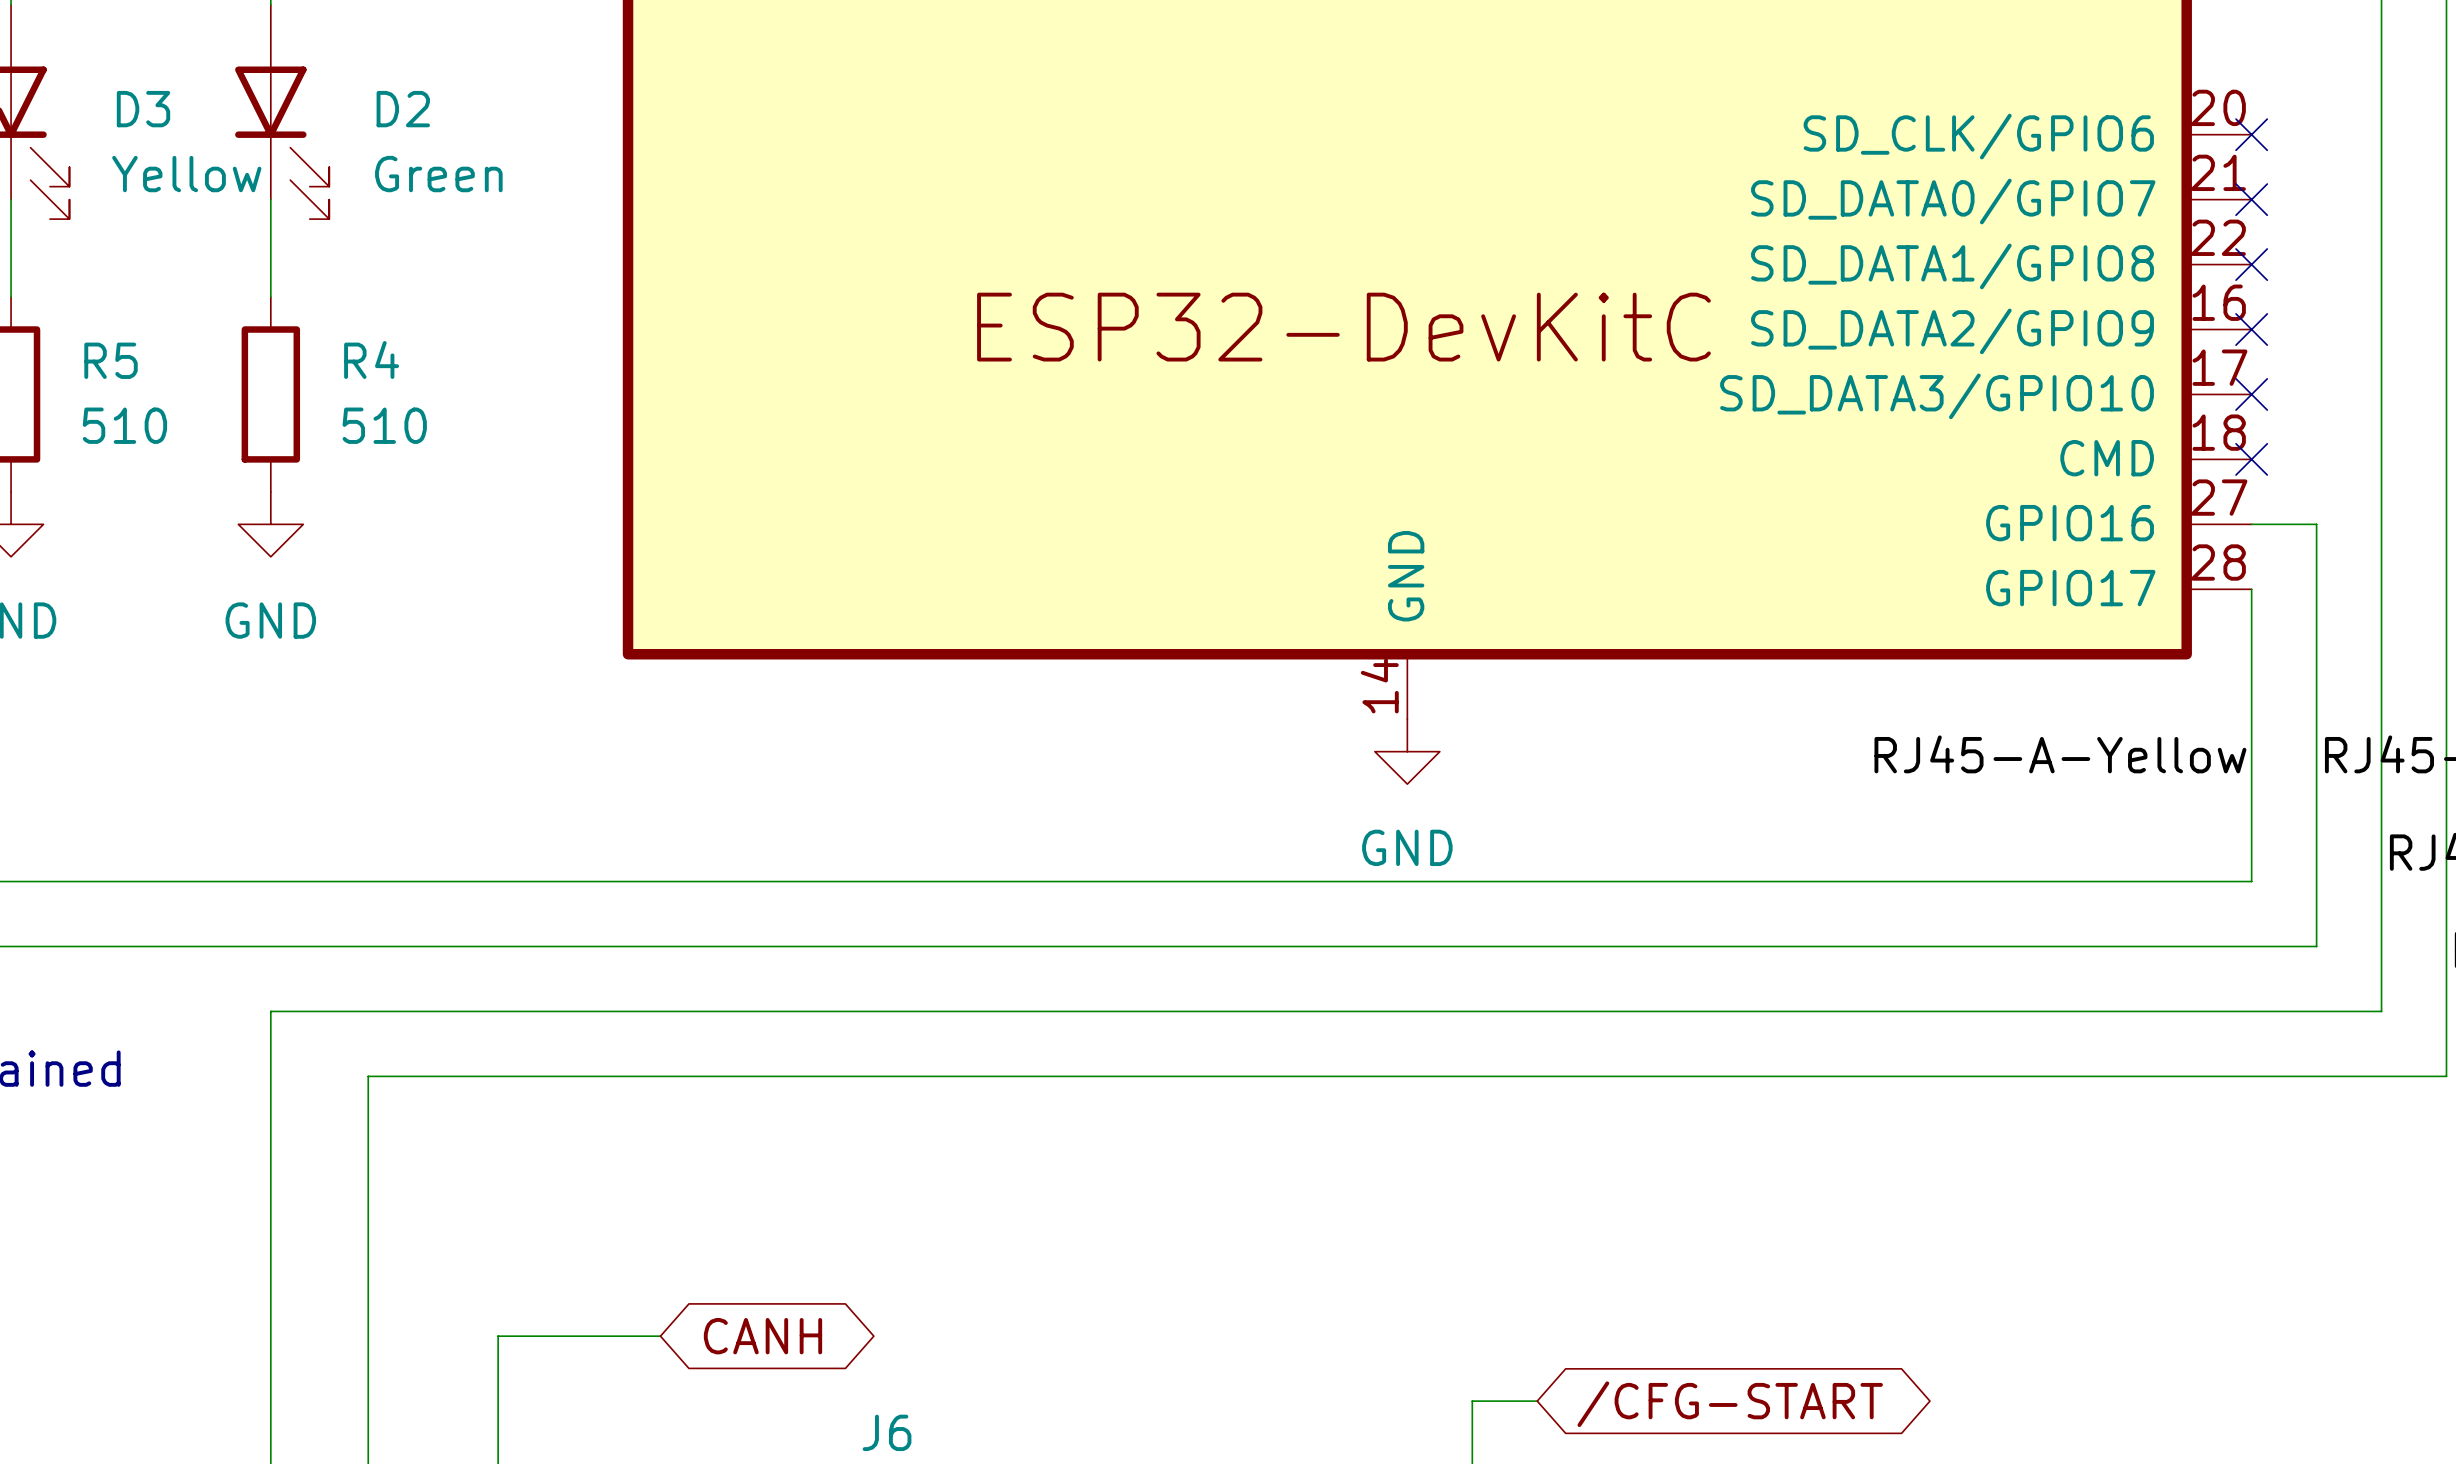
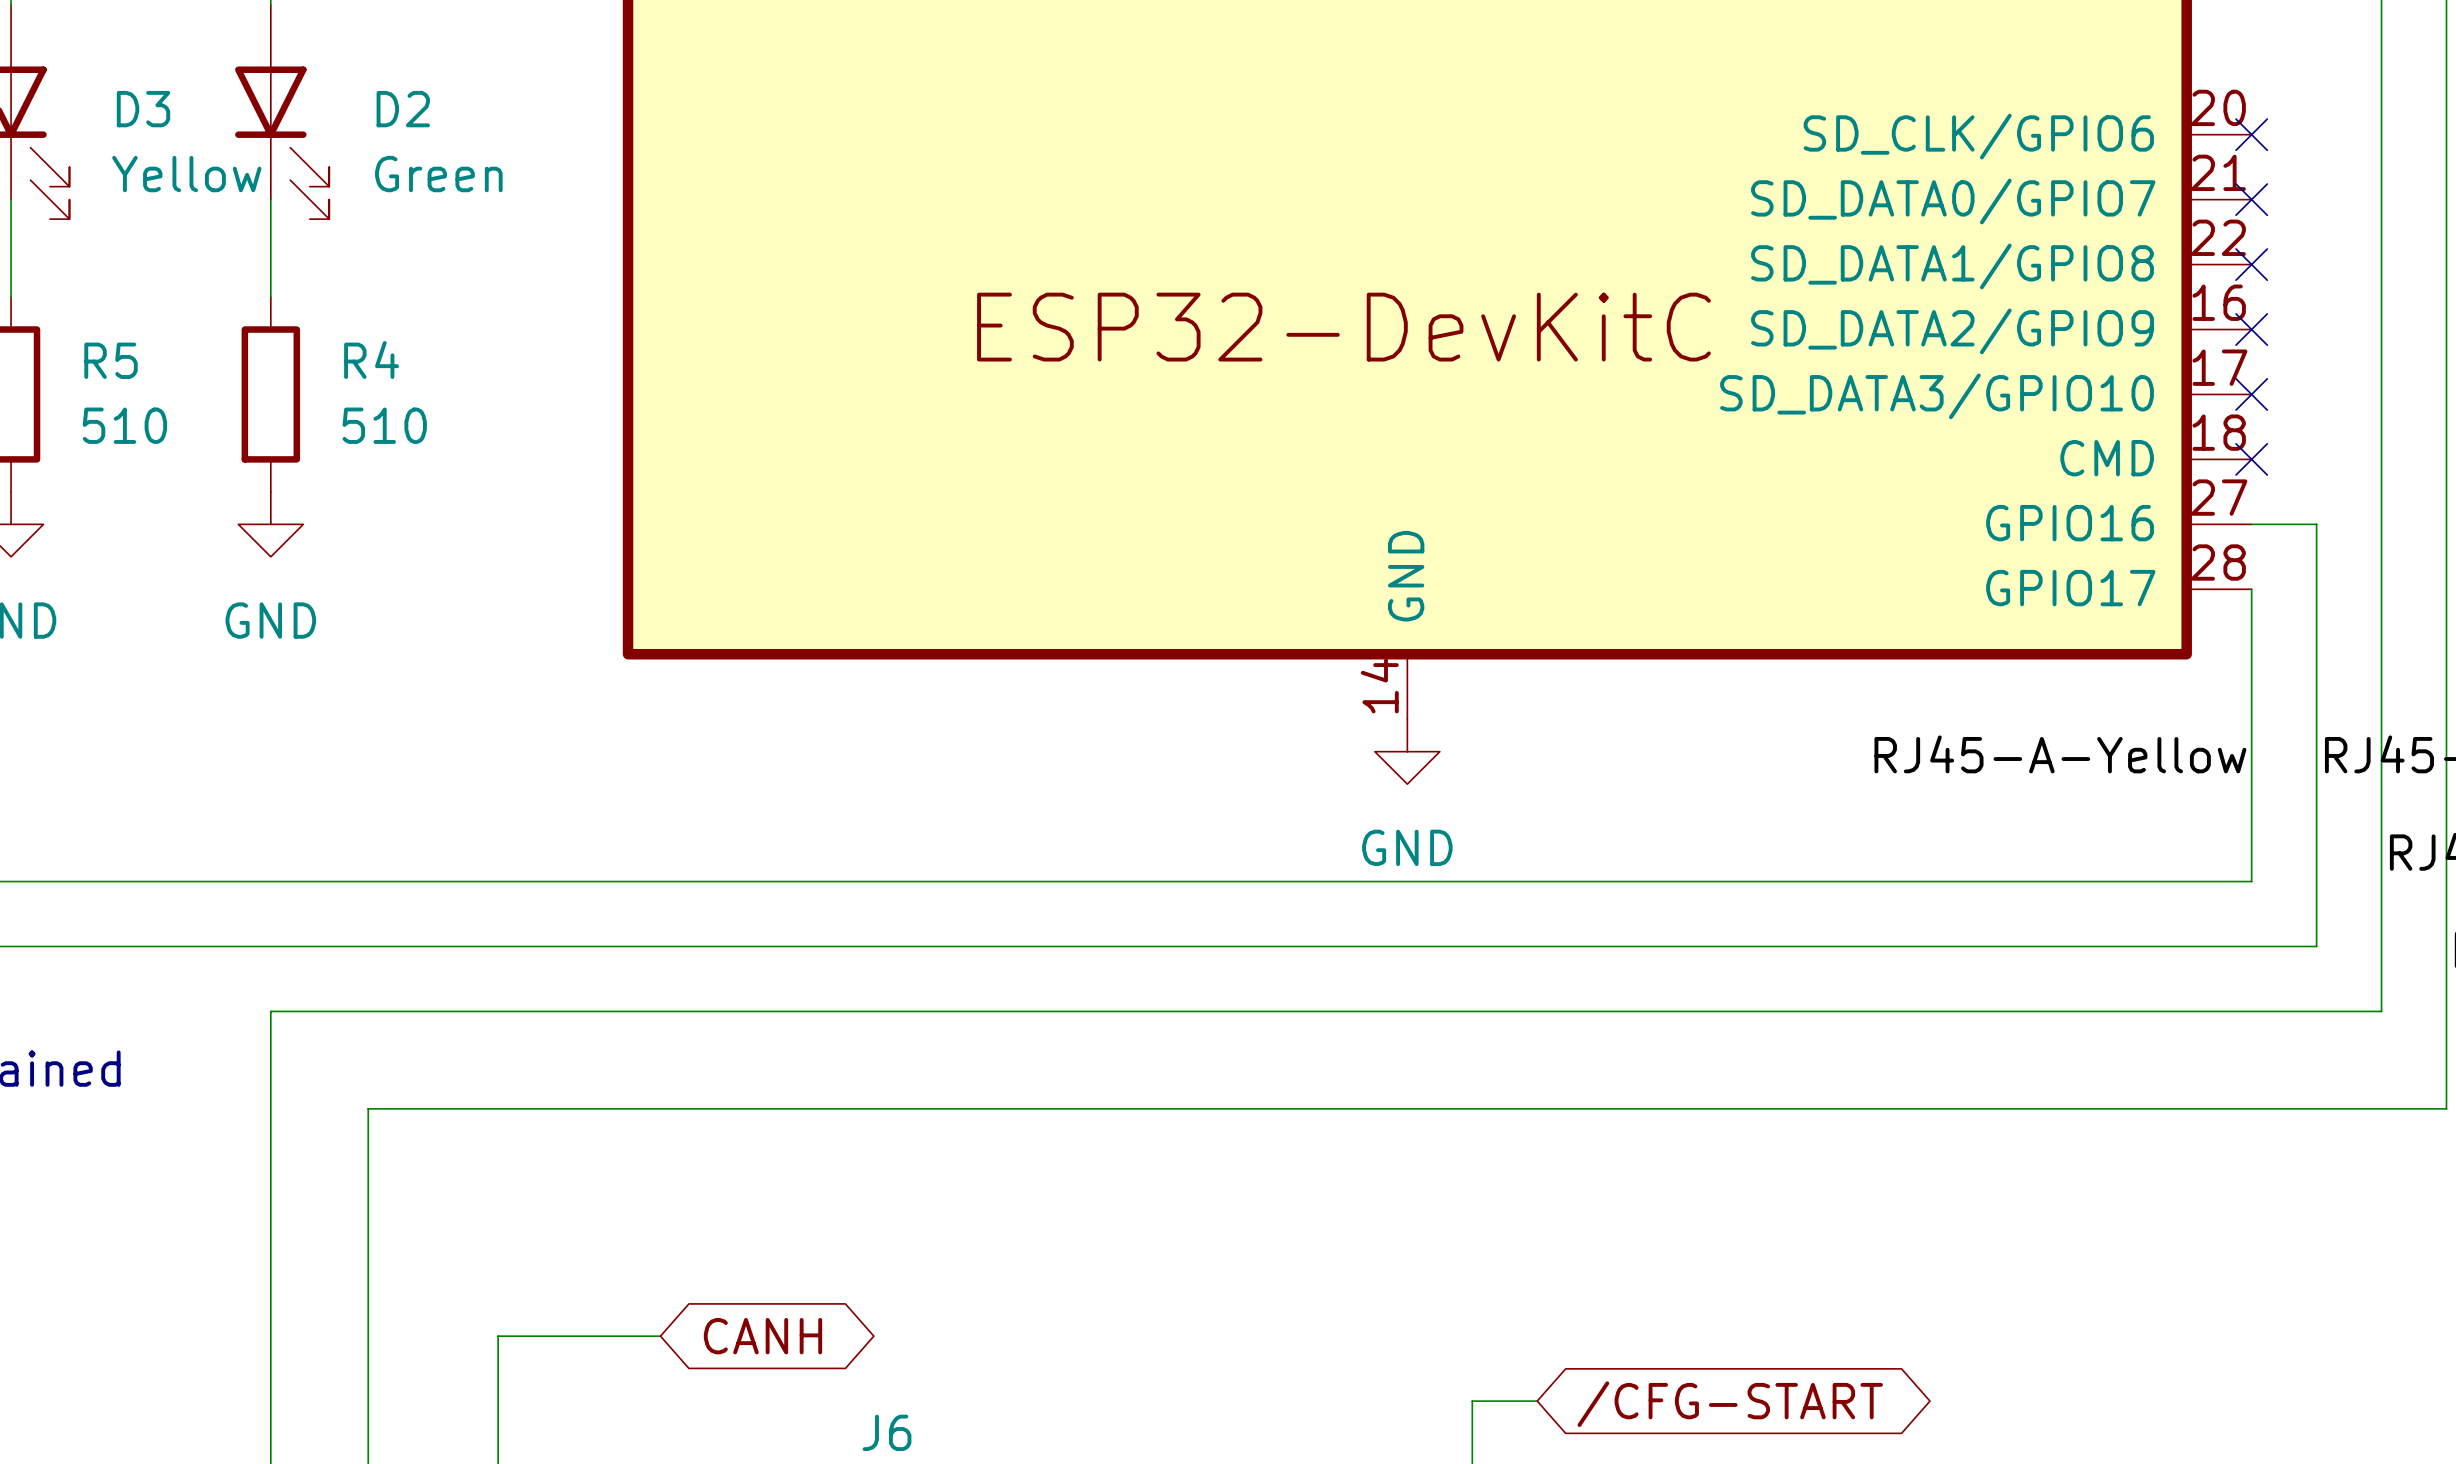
wire: (2446, 1076) (368, 1076) (368, 1108) -> (2446, 1076) (2446, 1108) (368, 1108)

